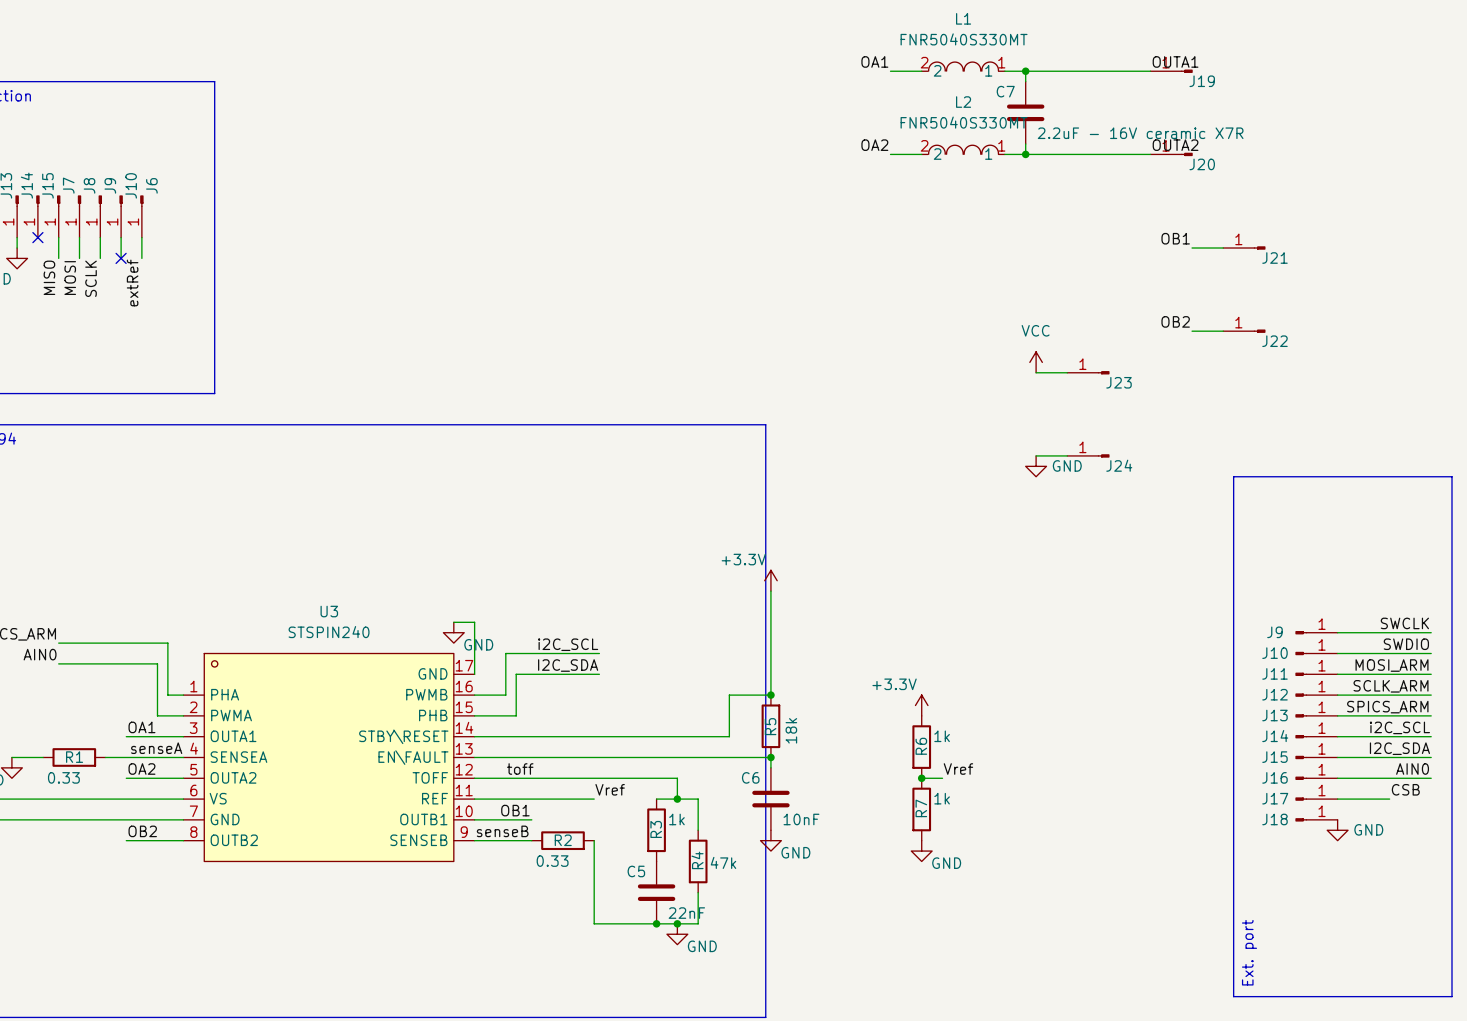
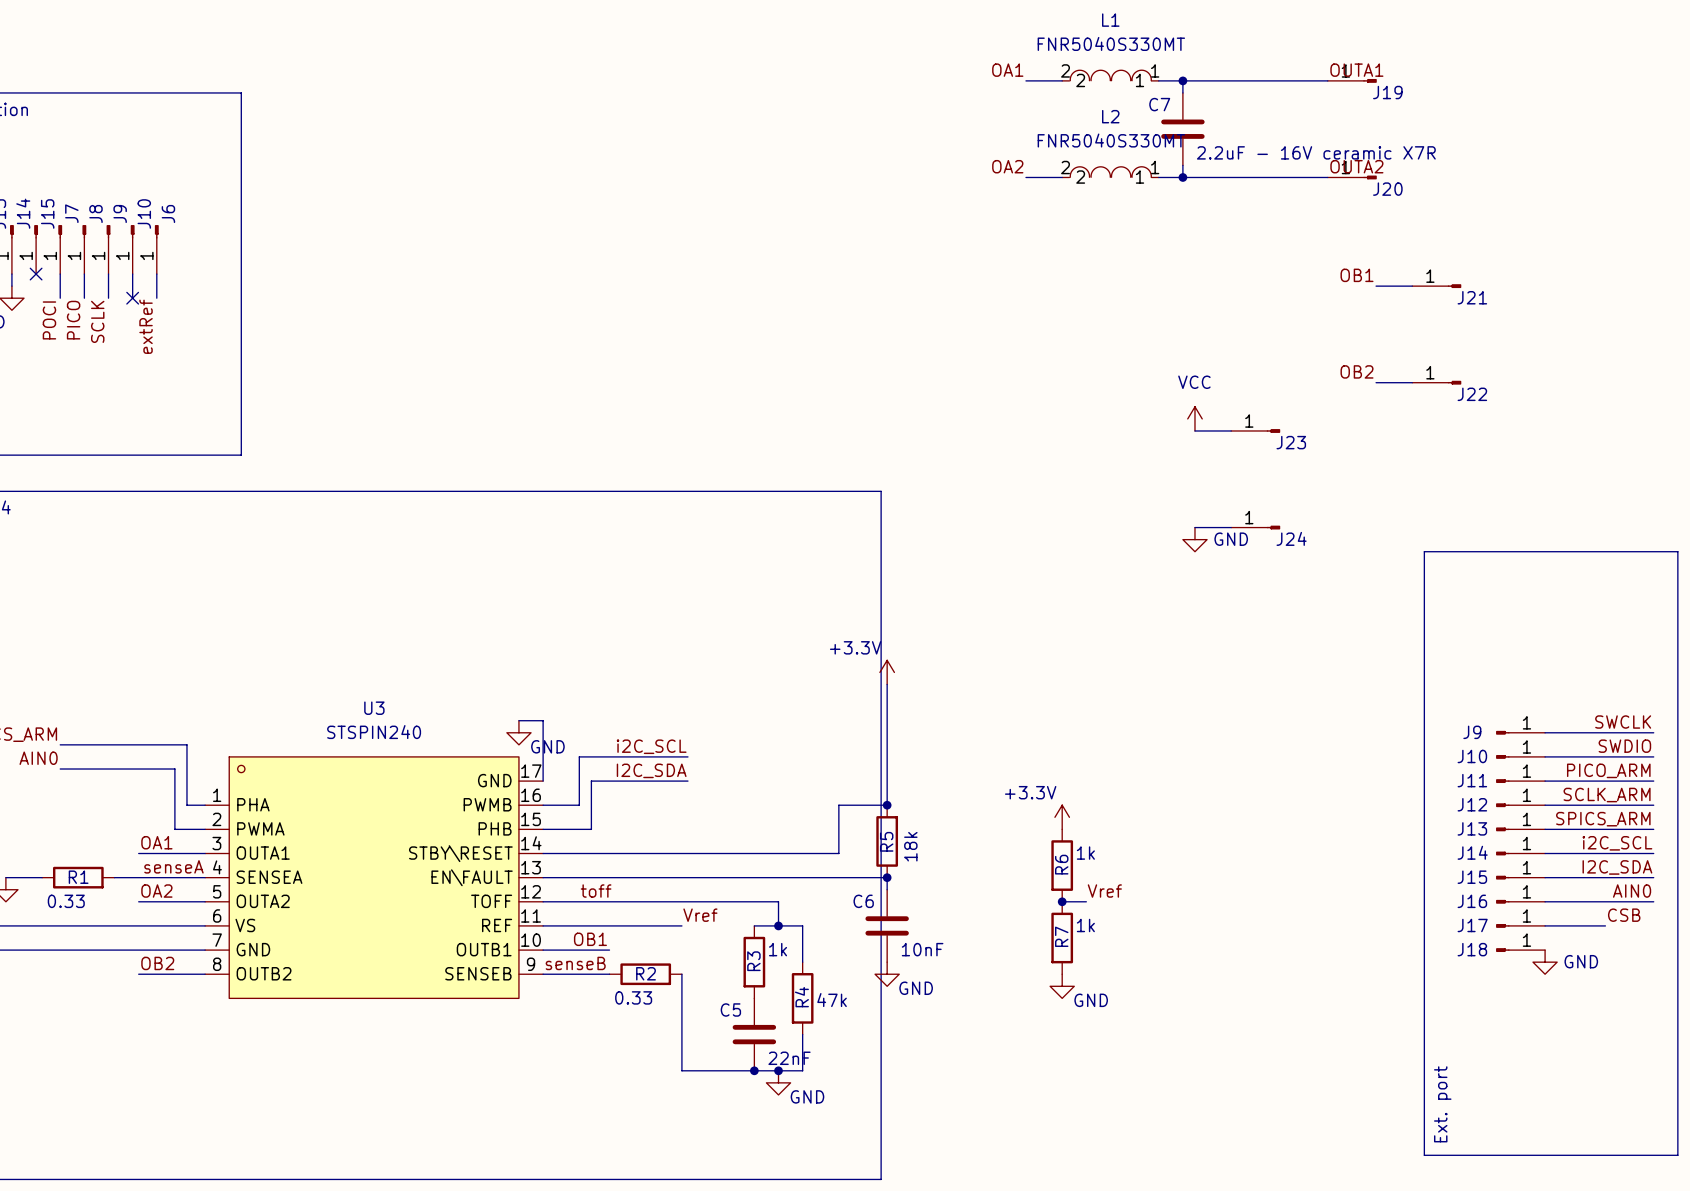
label: MISO (49, 277) -> POCI (49, 320)
label: MOSI (70, 278) -> PICO (73, 320)
label: MOSI_ARM (1392, 665) -> PICO_ARM (1608, 770)

